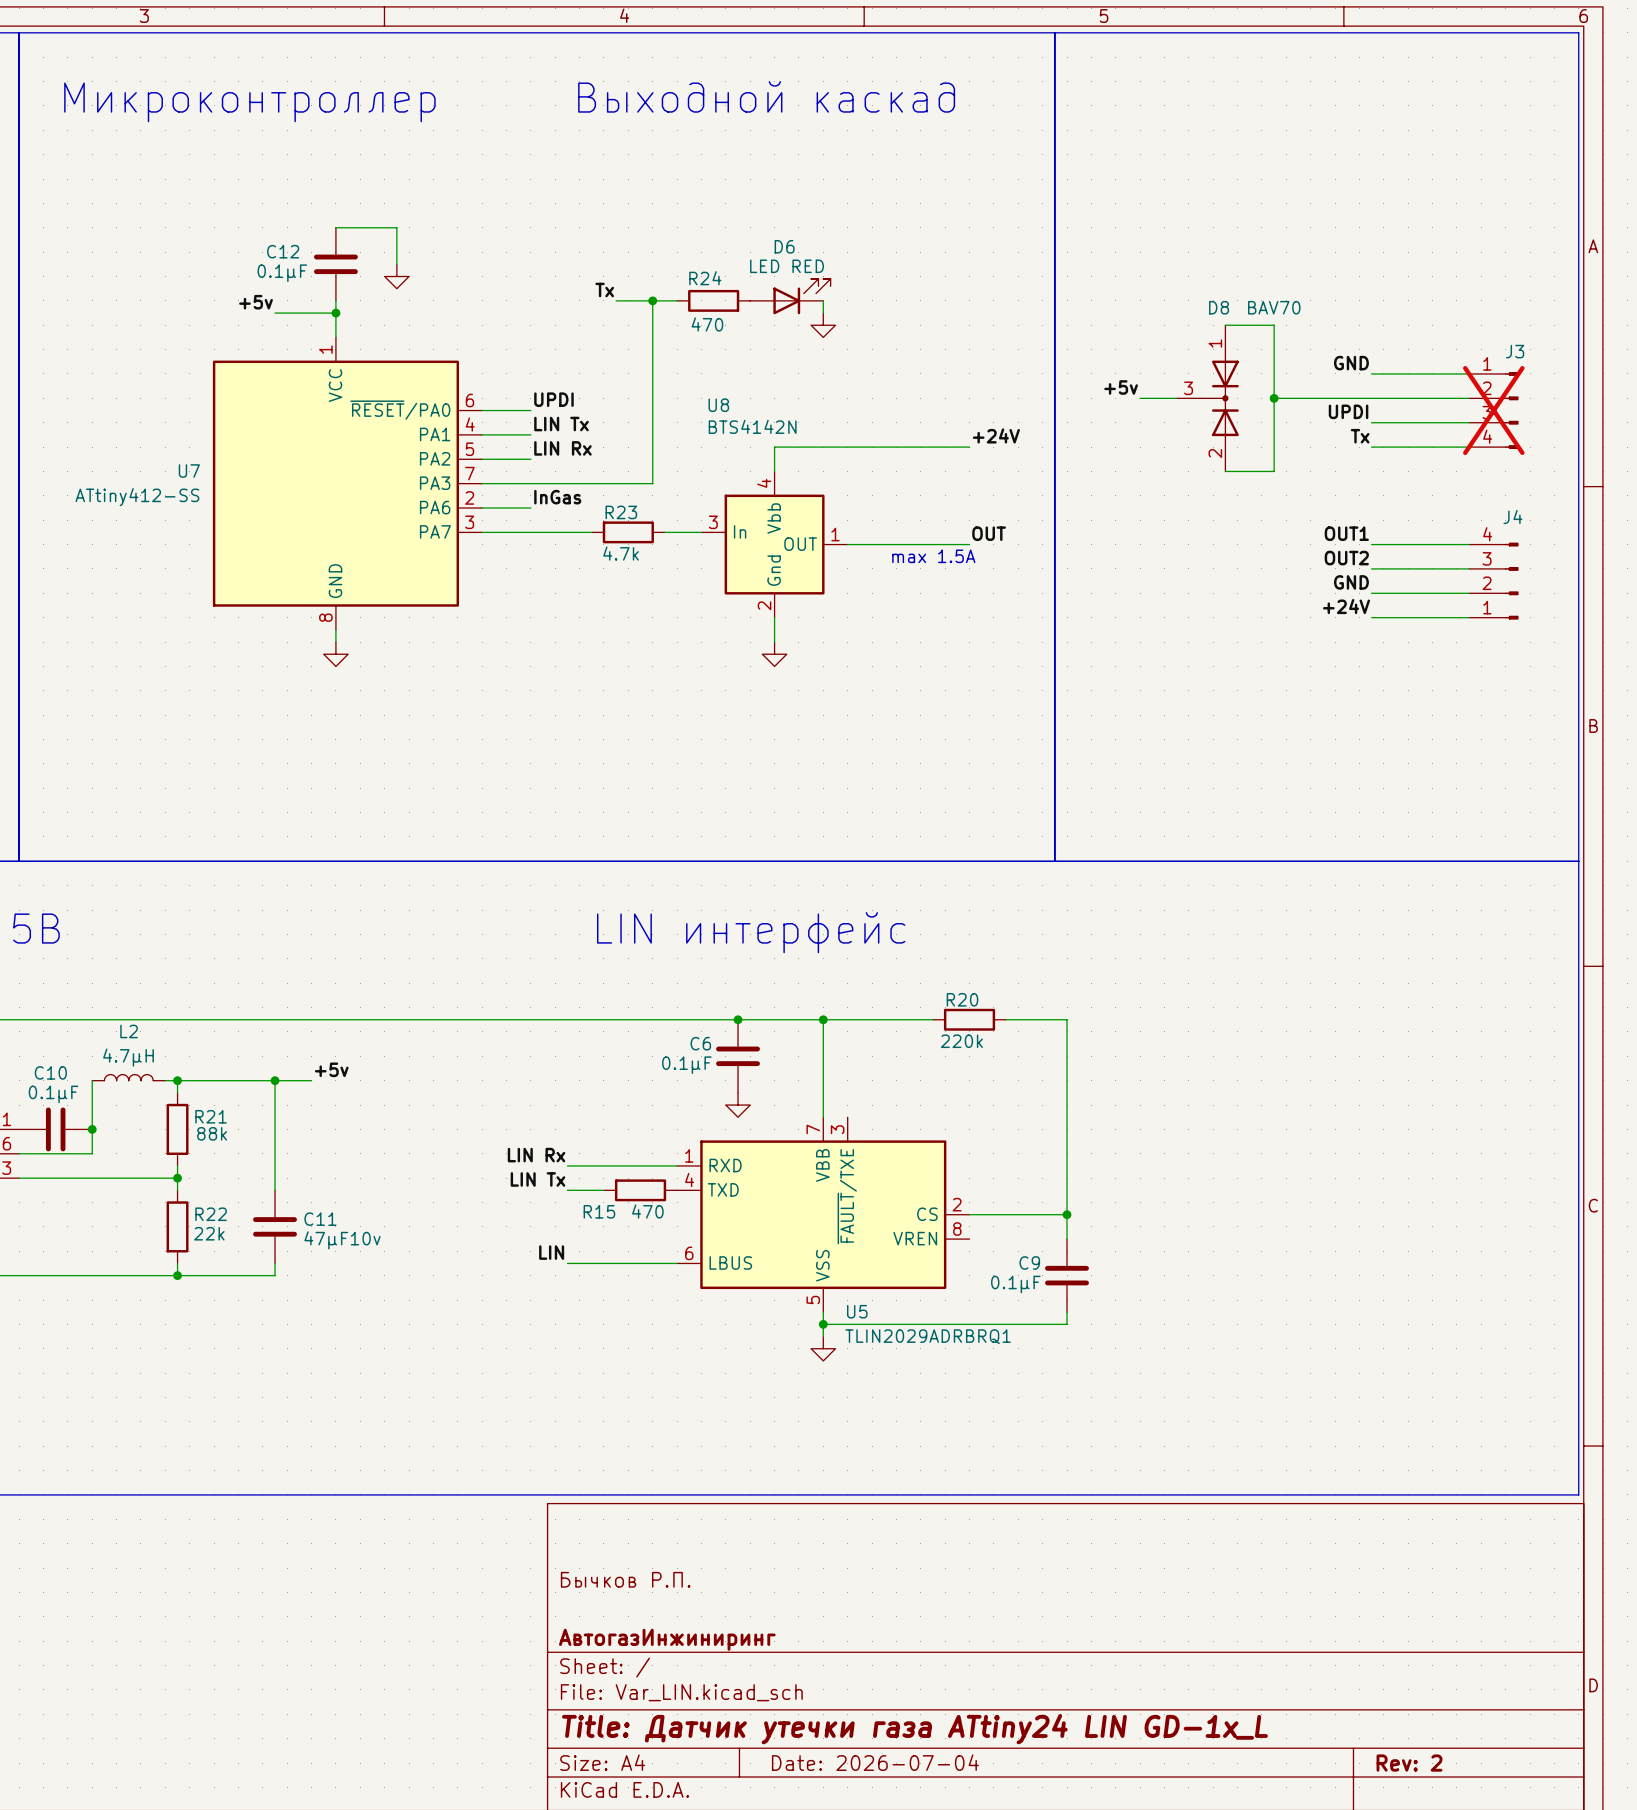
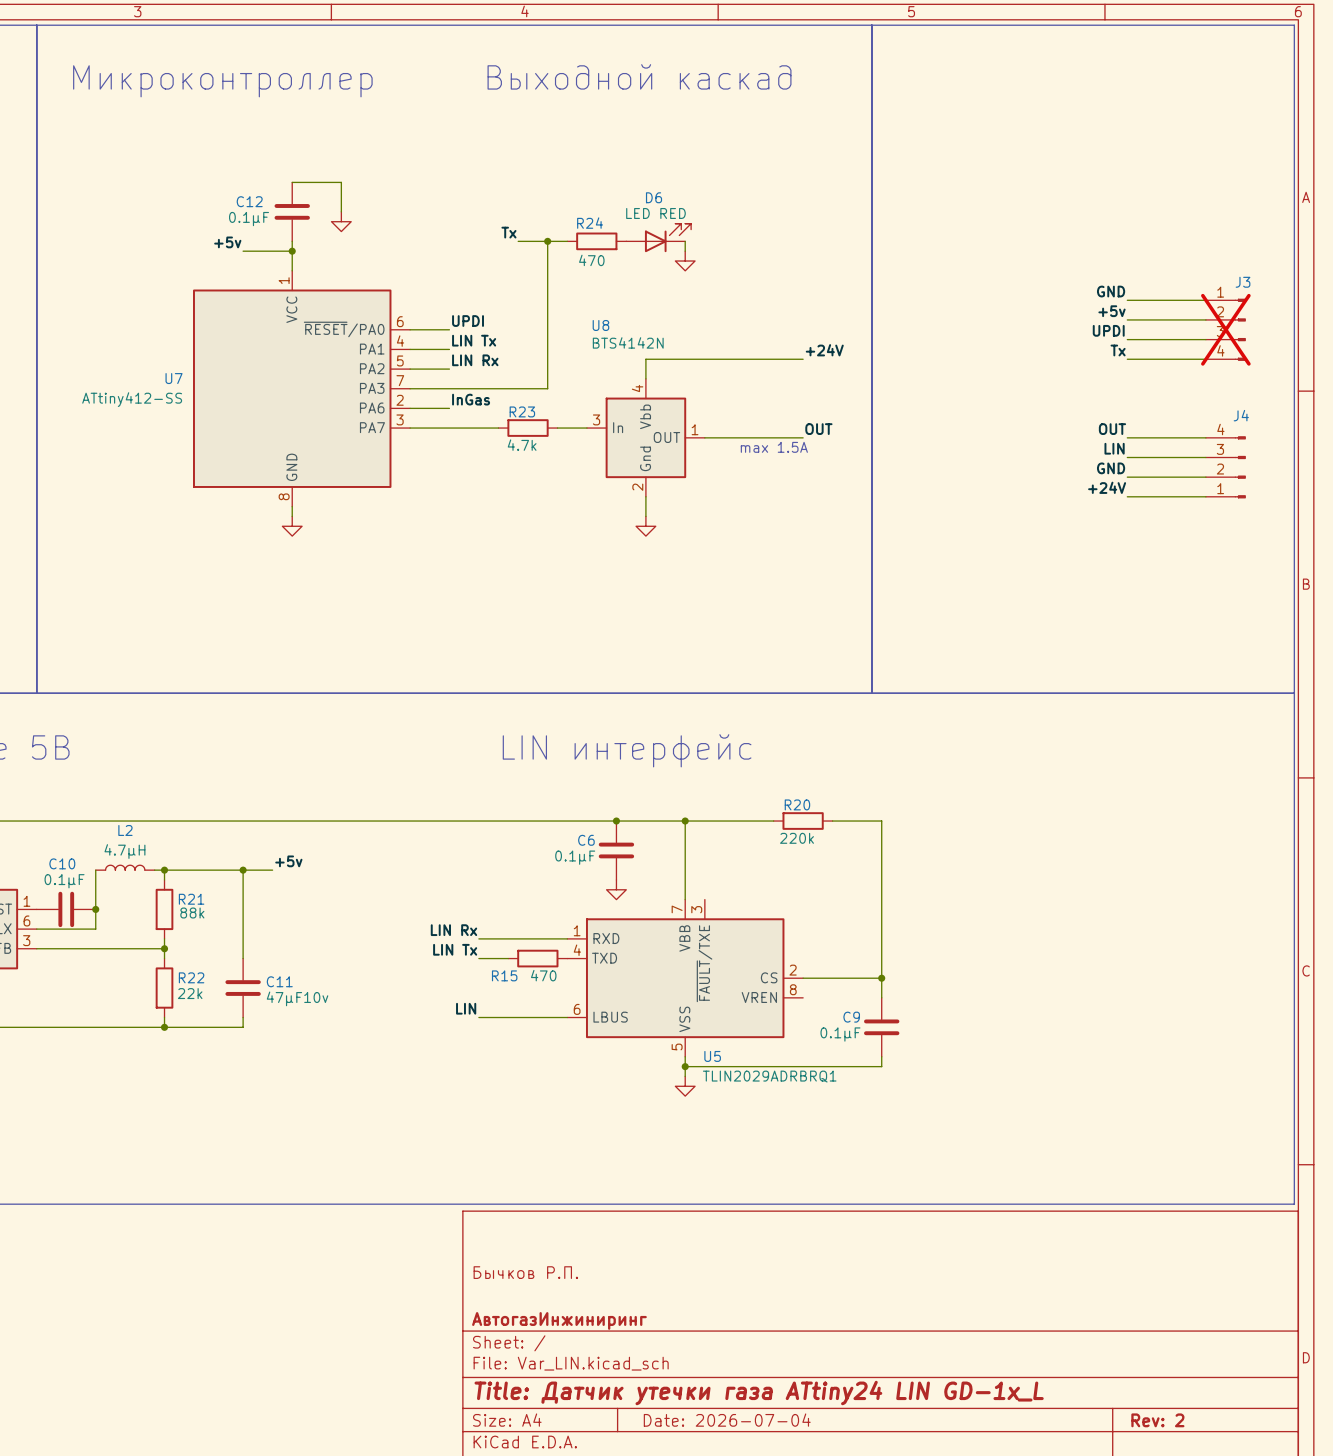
wire: (1225, 325) (1274, 325) (1274, 471) (1225, 471) -> none
label position: +5v (1121, 387) -> +5v (1112, 311)
wire: (1140, 398) (1176, 398) -> none
D8: BAV70 (1207, 398) -> none
wire: (1274, 398) (1371, 398) -> none
junction: (1274, 398) -> none
label: OUT1 (1346, 533) -> OUT (1112, 429)
label: OUT2 (1346, 558) -> LIN (1114, 448)

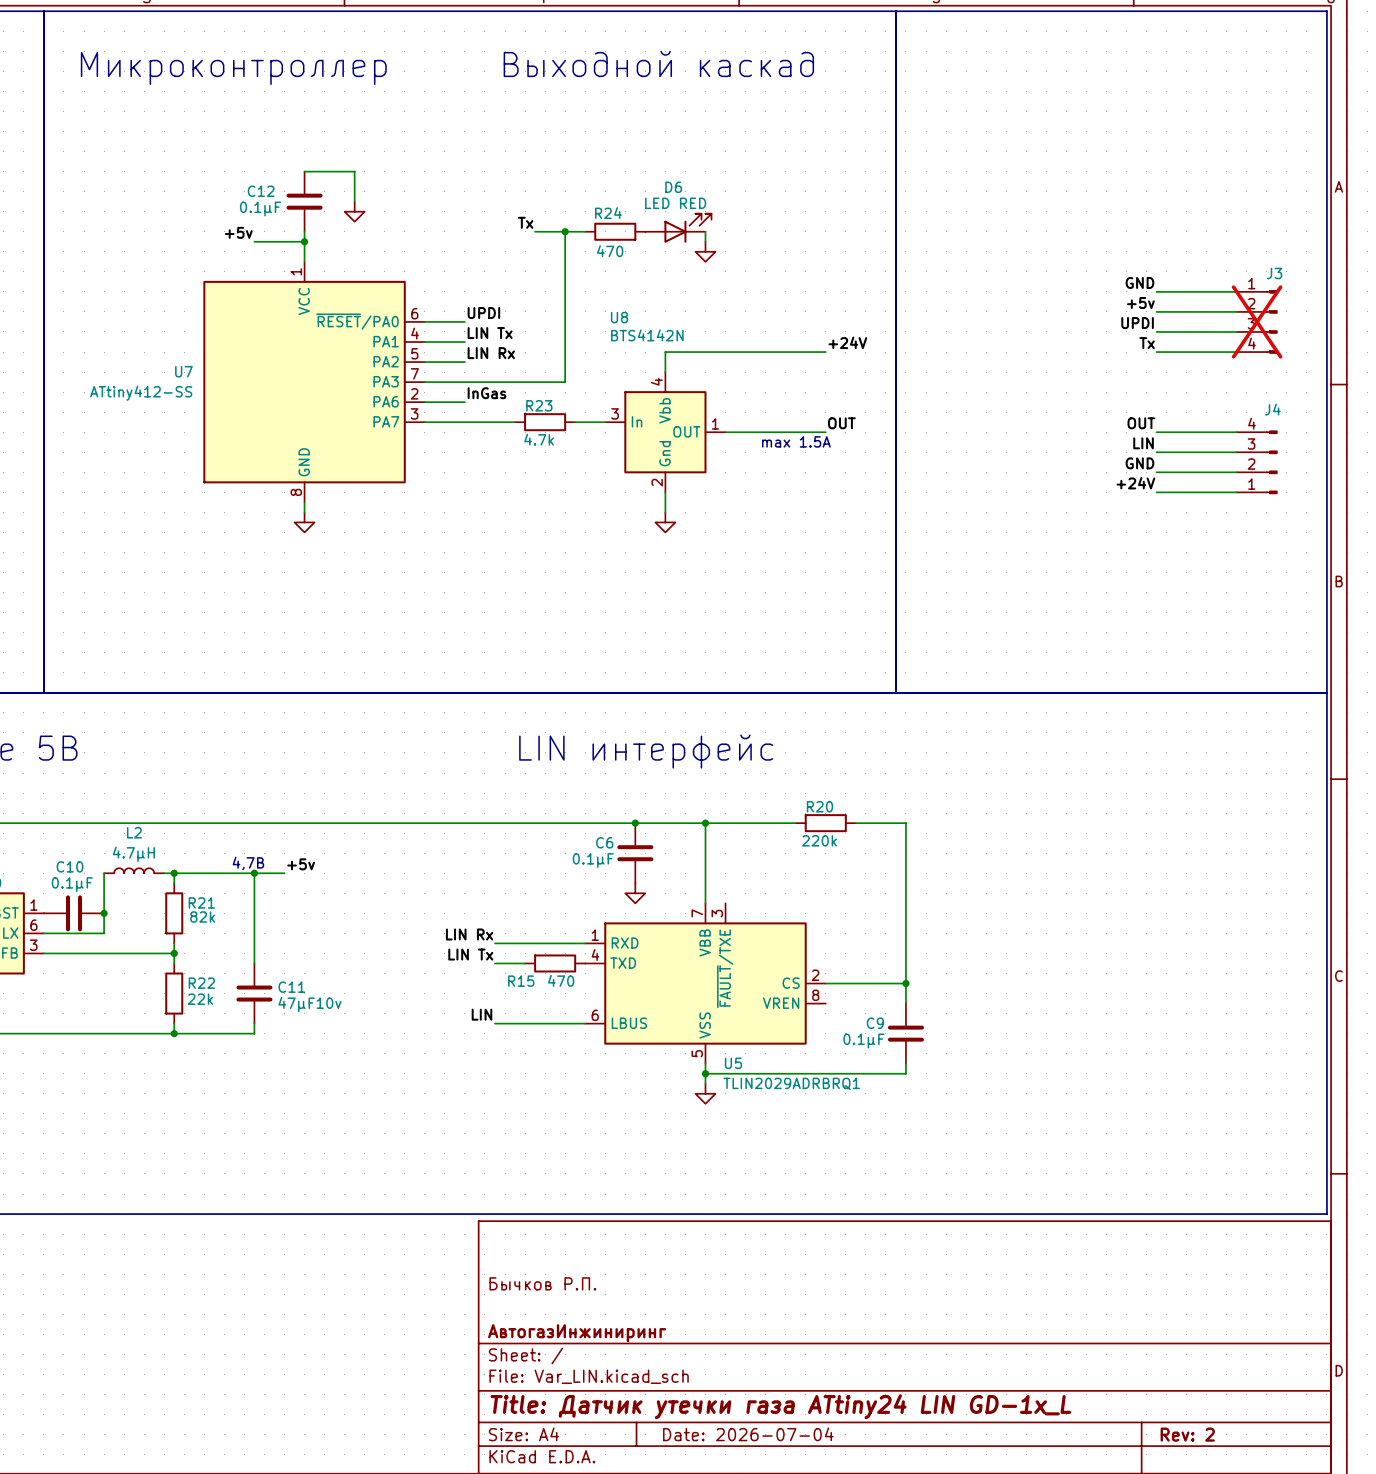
text: none -> 4,7В (248, 863)
R21 value: 88k (192, 913) -> 82k (202, 916)

